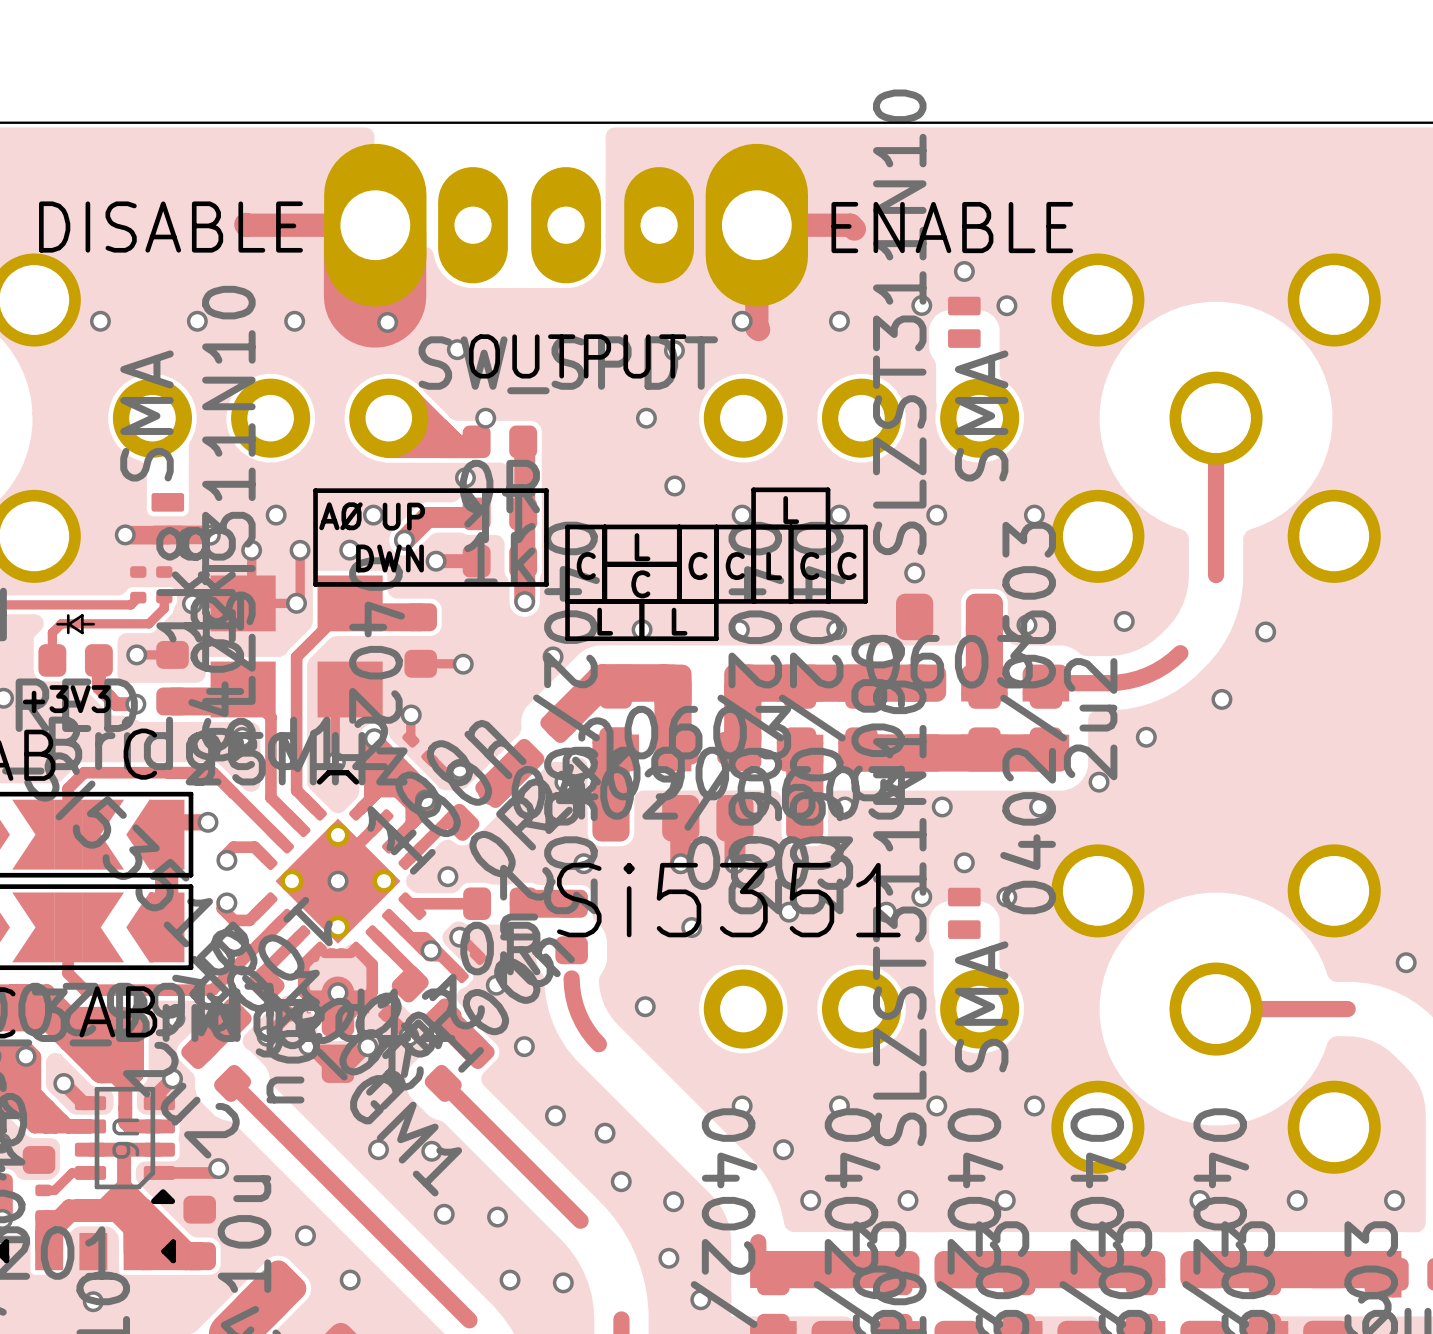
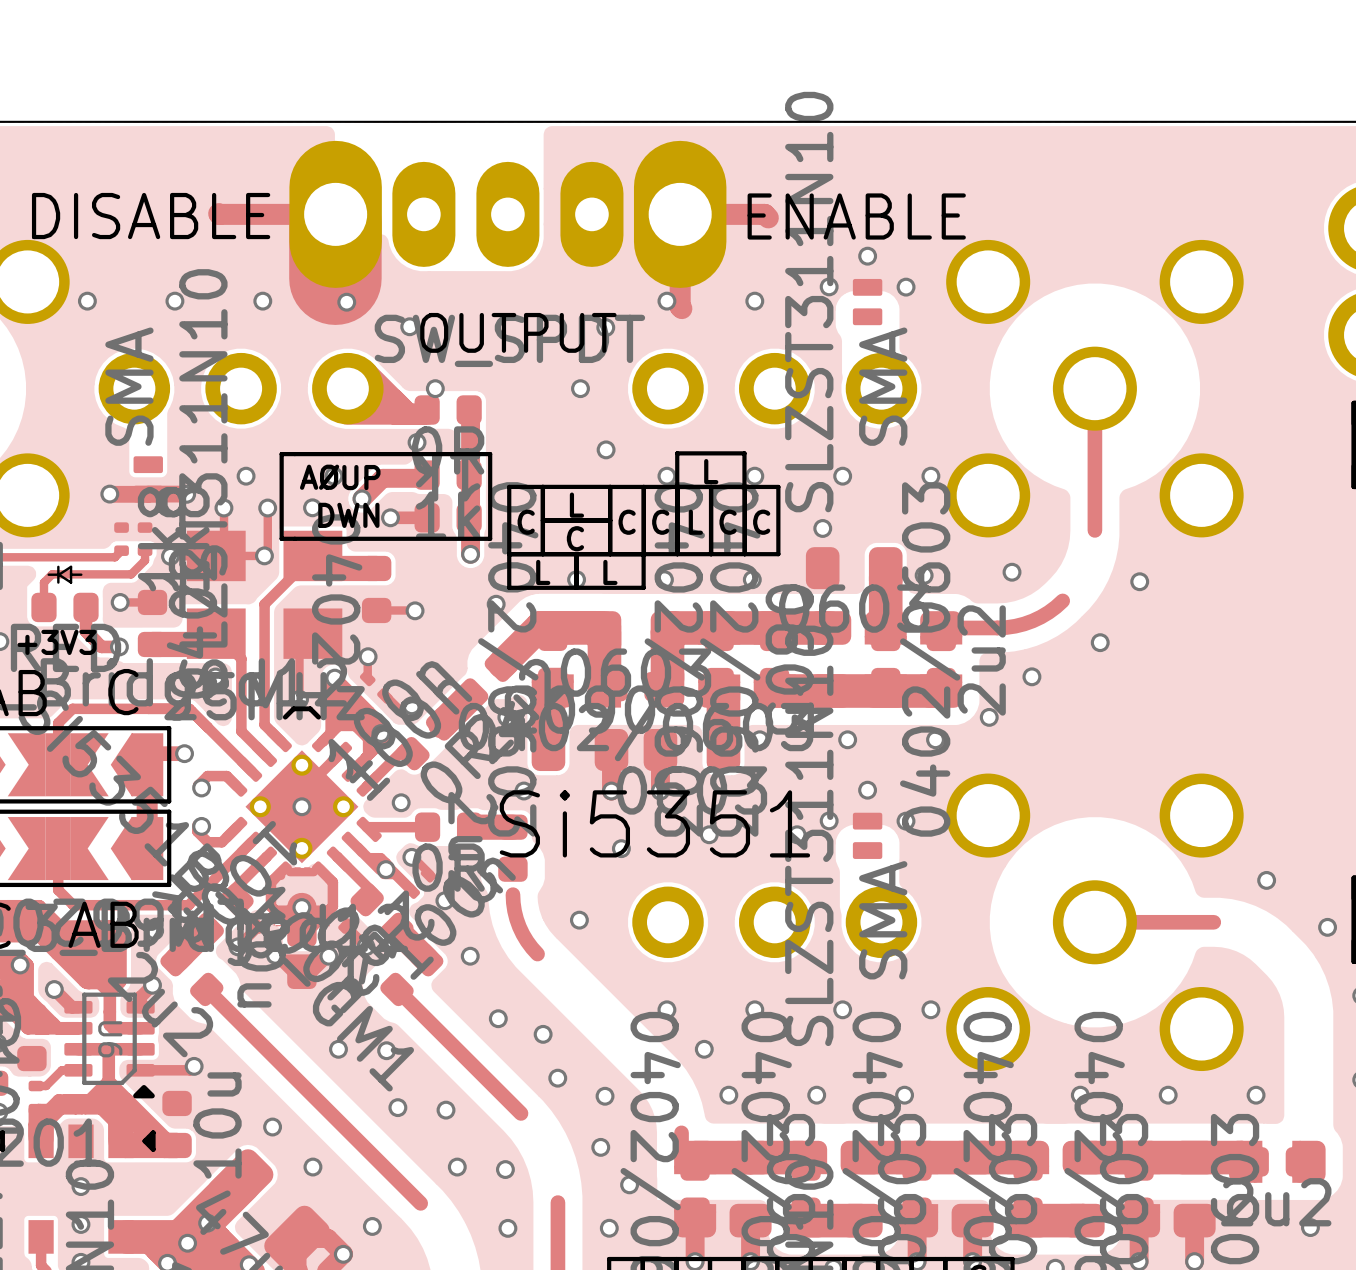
text position: AØ (340, 516) -> AØ (319, 477)

